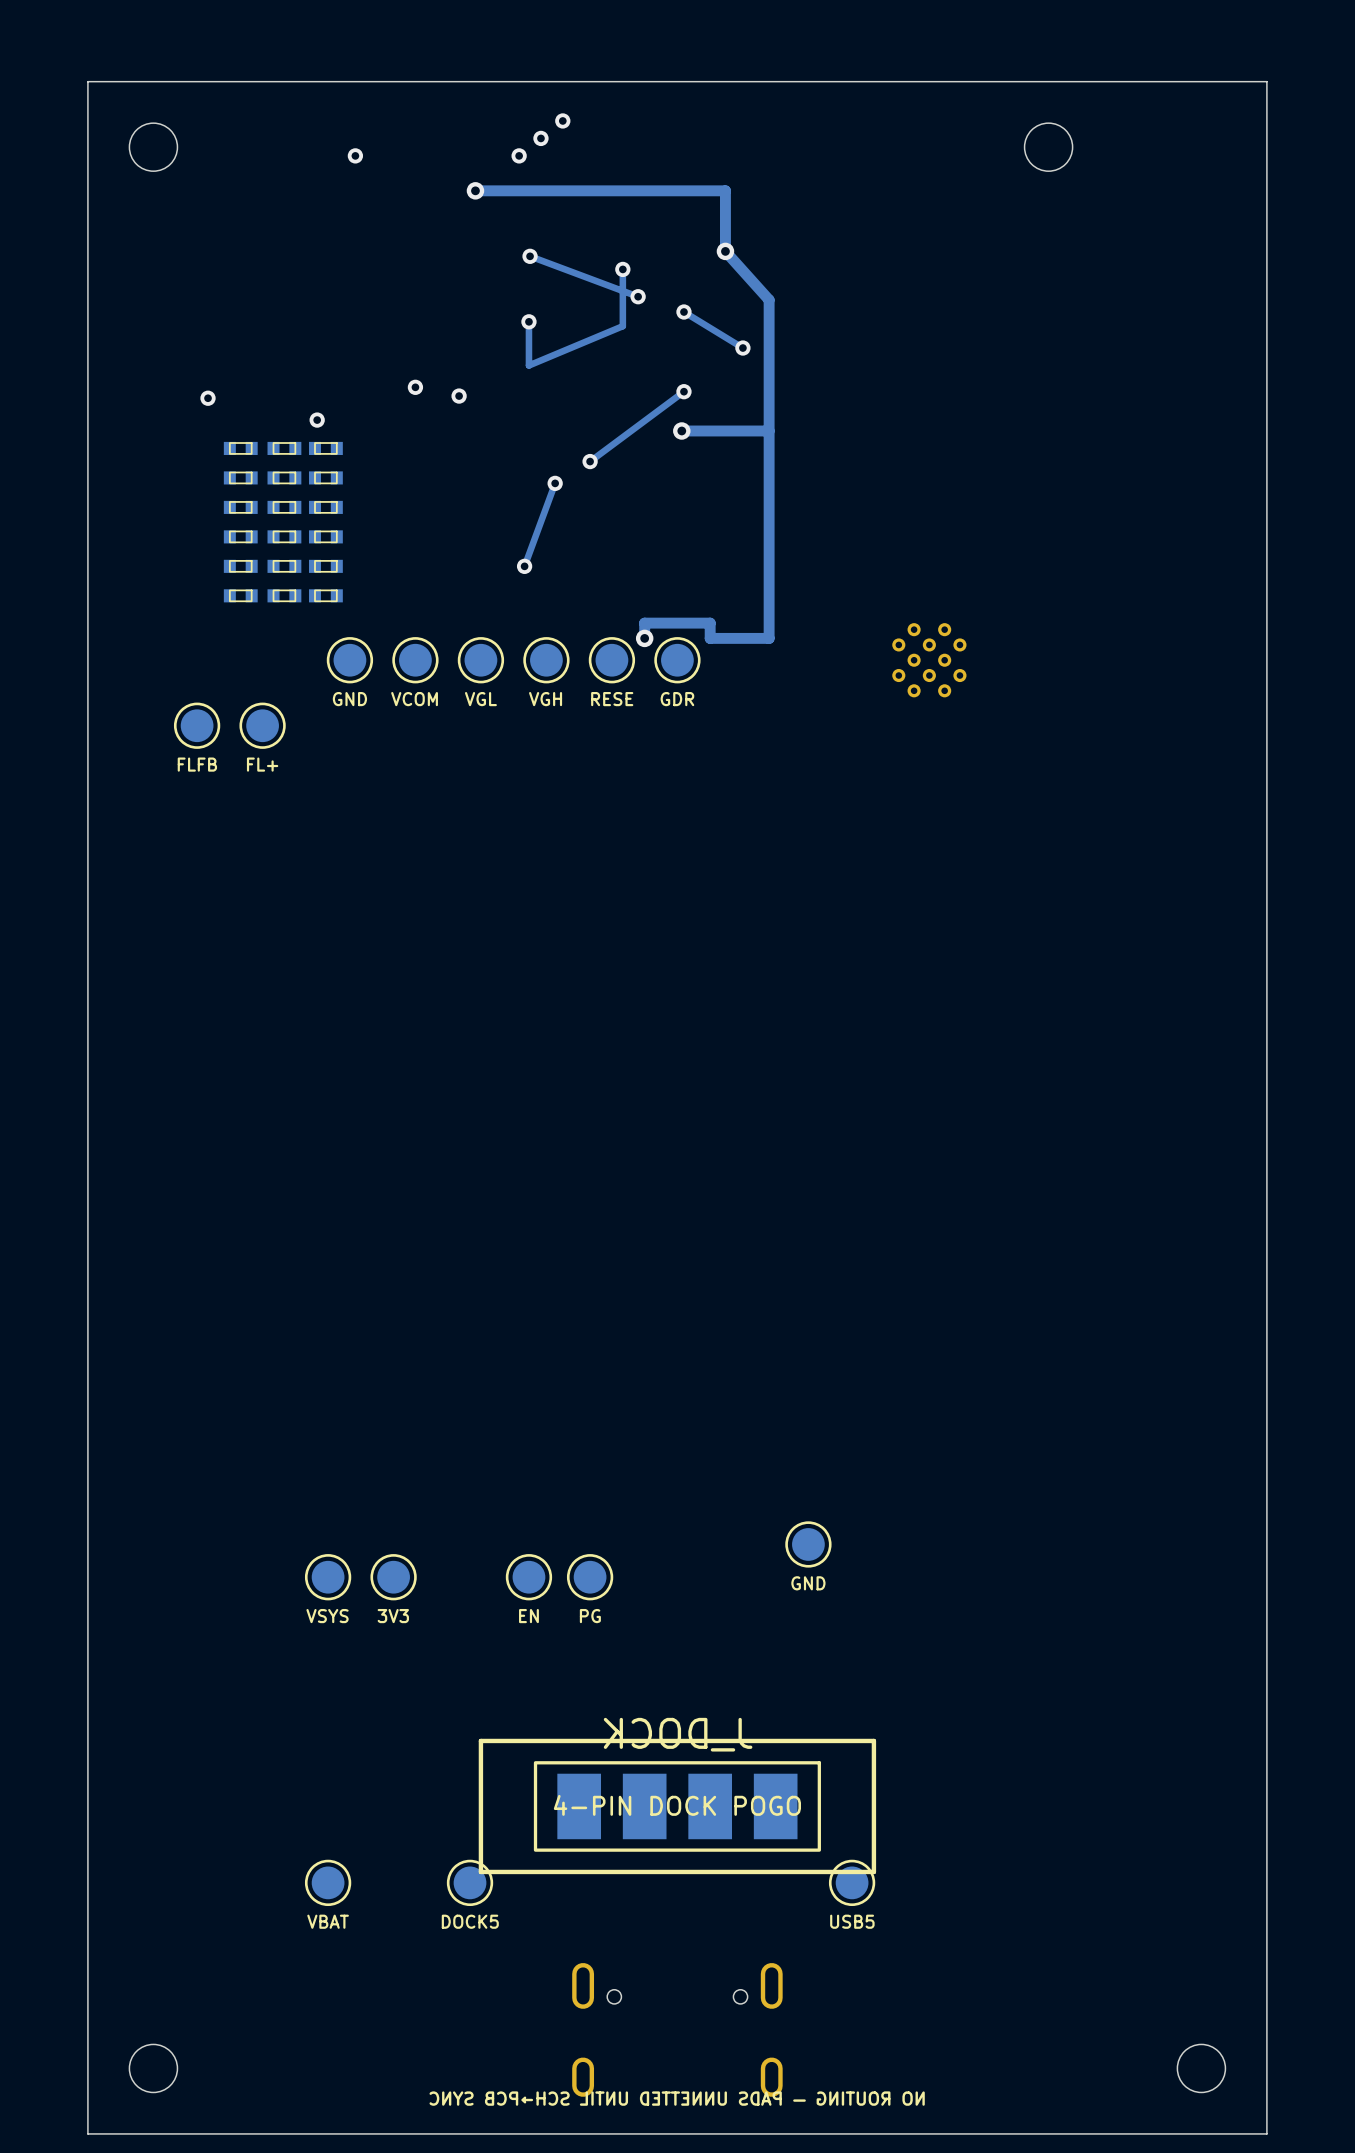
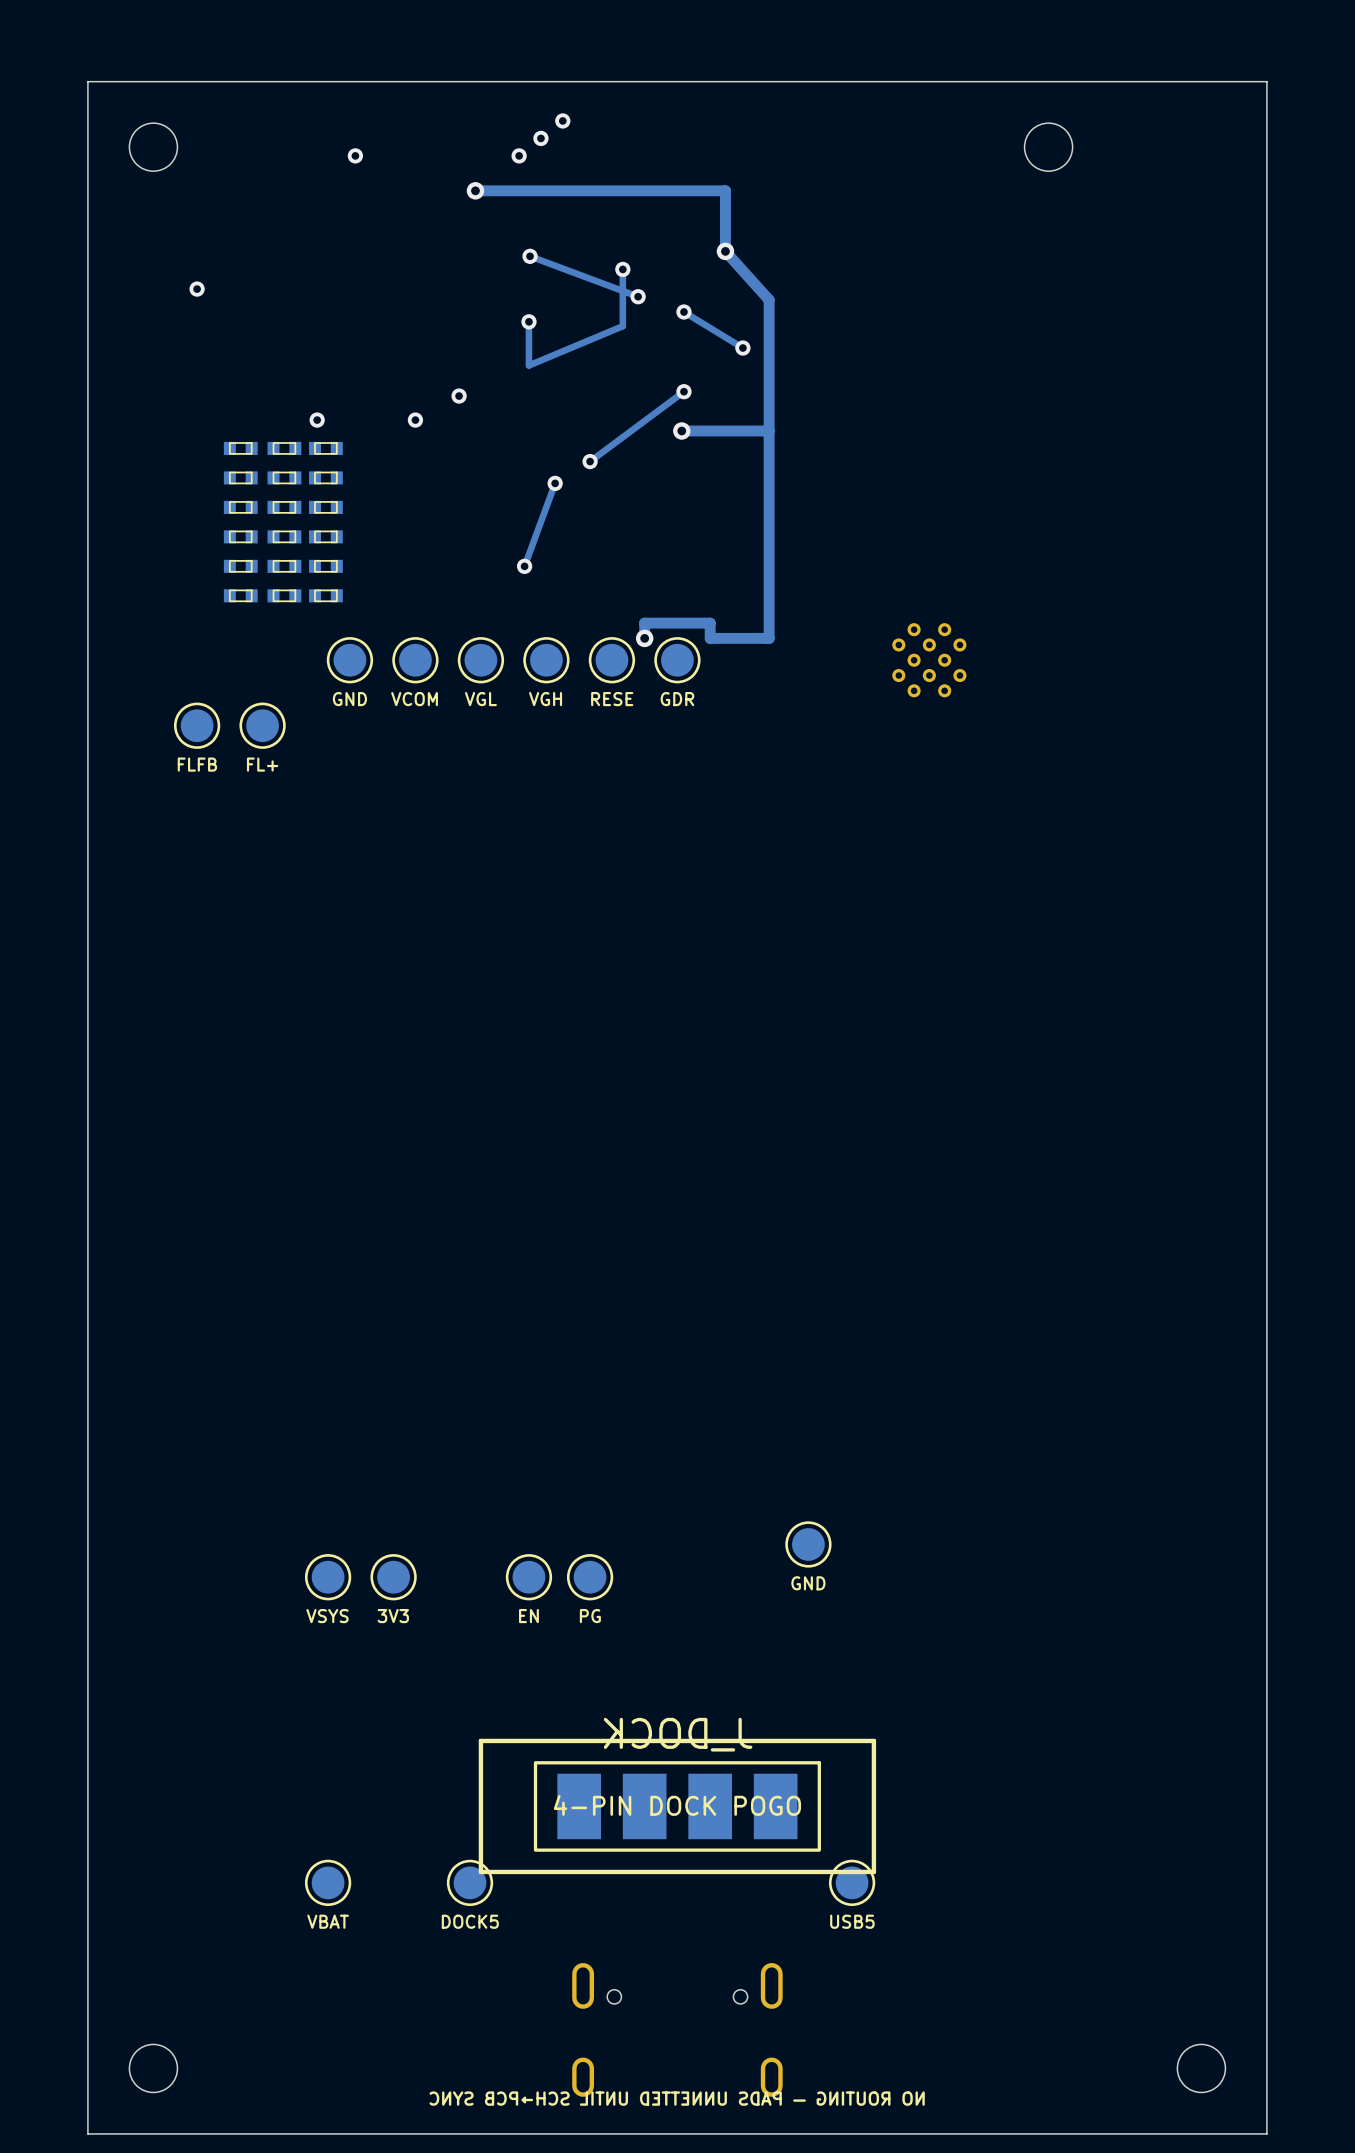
via: none -> (197, 289)
via position: (415, 387) -> (415, 420)
via: (208, 398) -> none

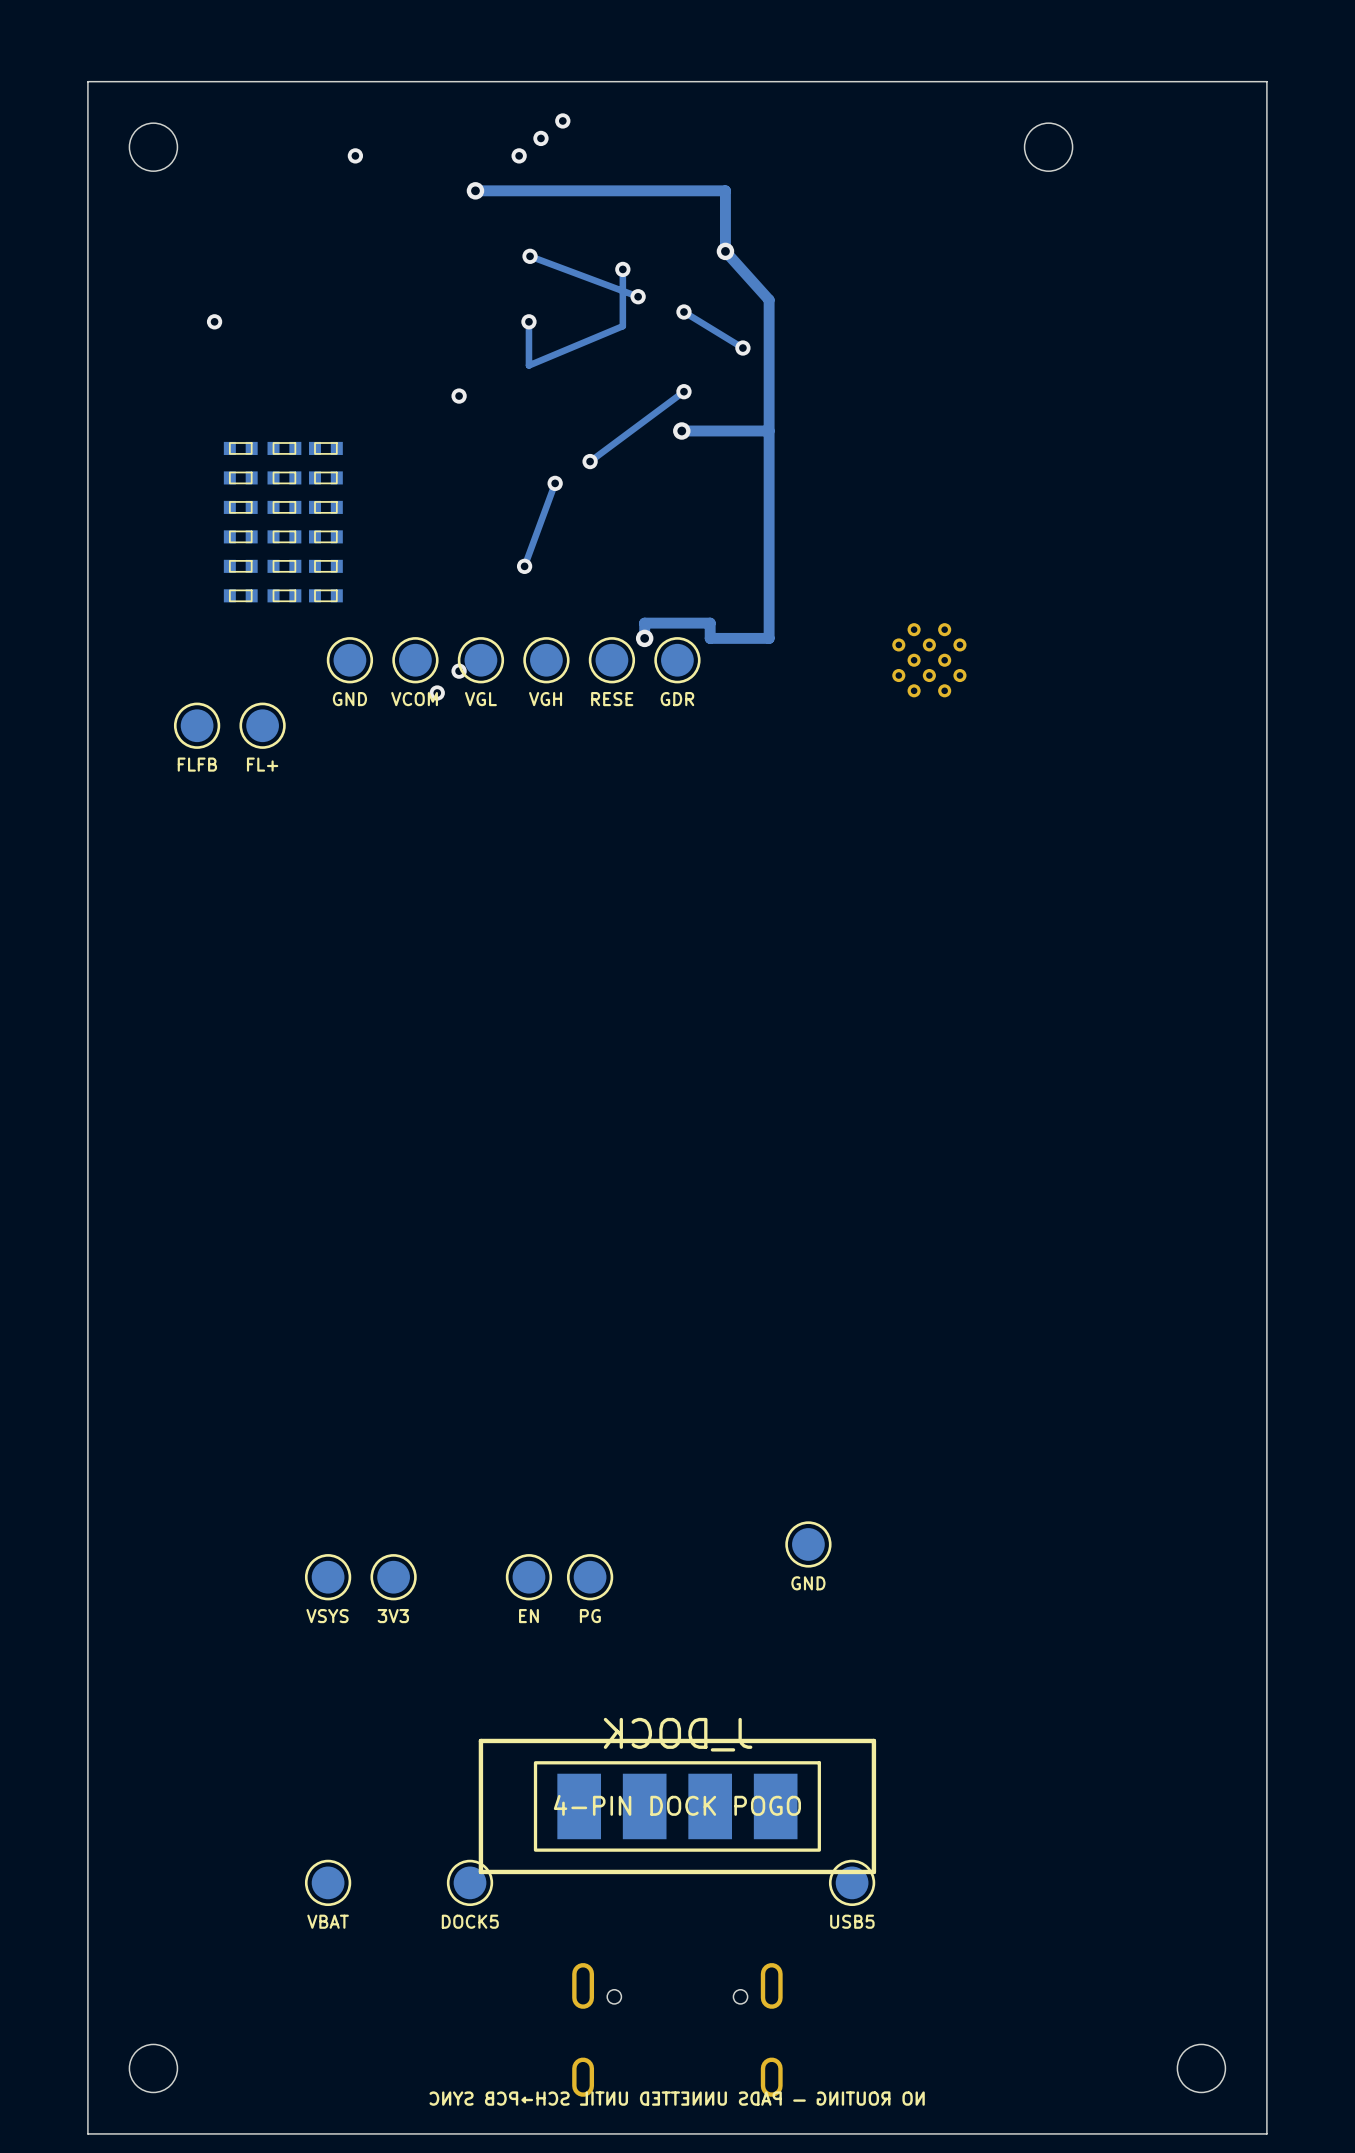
via position: (197, 289) -> (214, 321)
via: (317, 420) -> none
via: (415, 420) -> none
via: none -> (459, 671)
via: none -> (437, 692)

